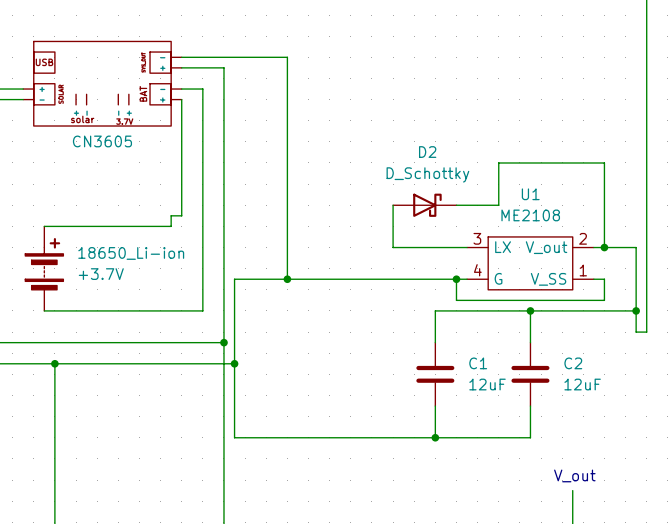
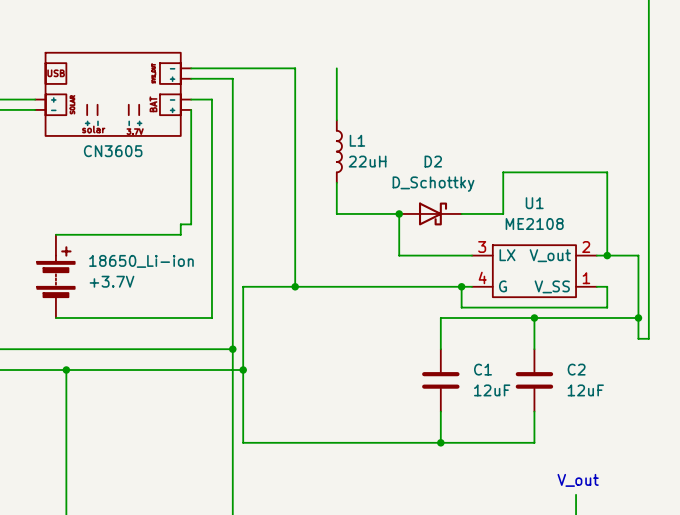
wire: none -> (336, 68) (336, 120)
L1: none -> 22uH (339, 151)
wire: none -> (336, 182) (336, 213) (399, 213)
junction: none -> (399, 213)

